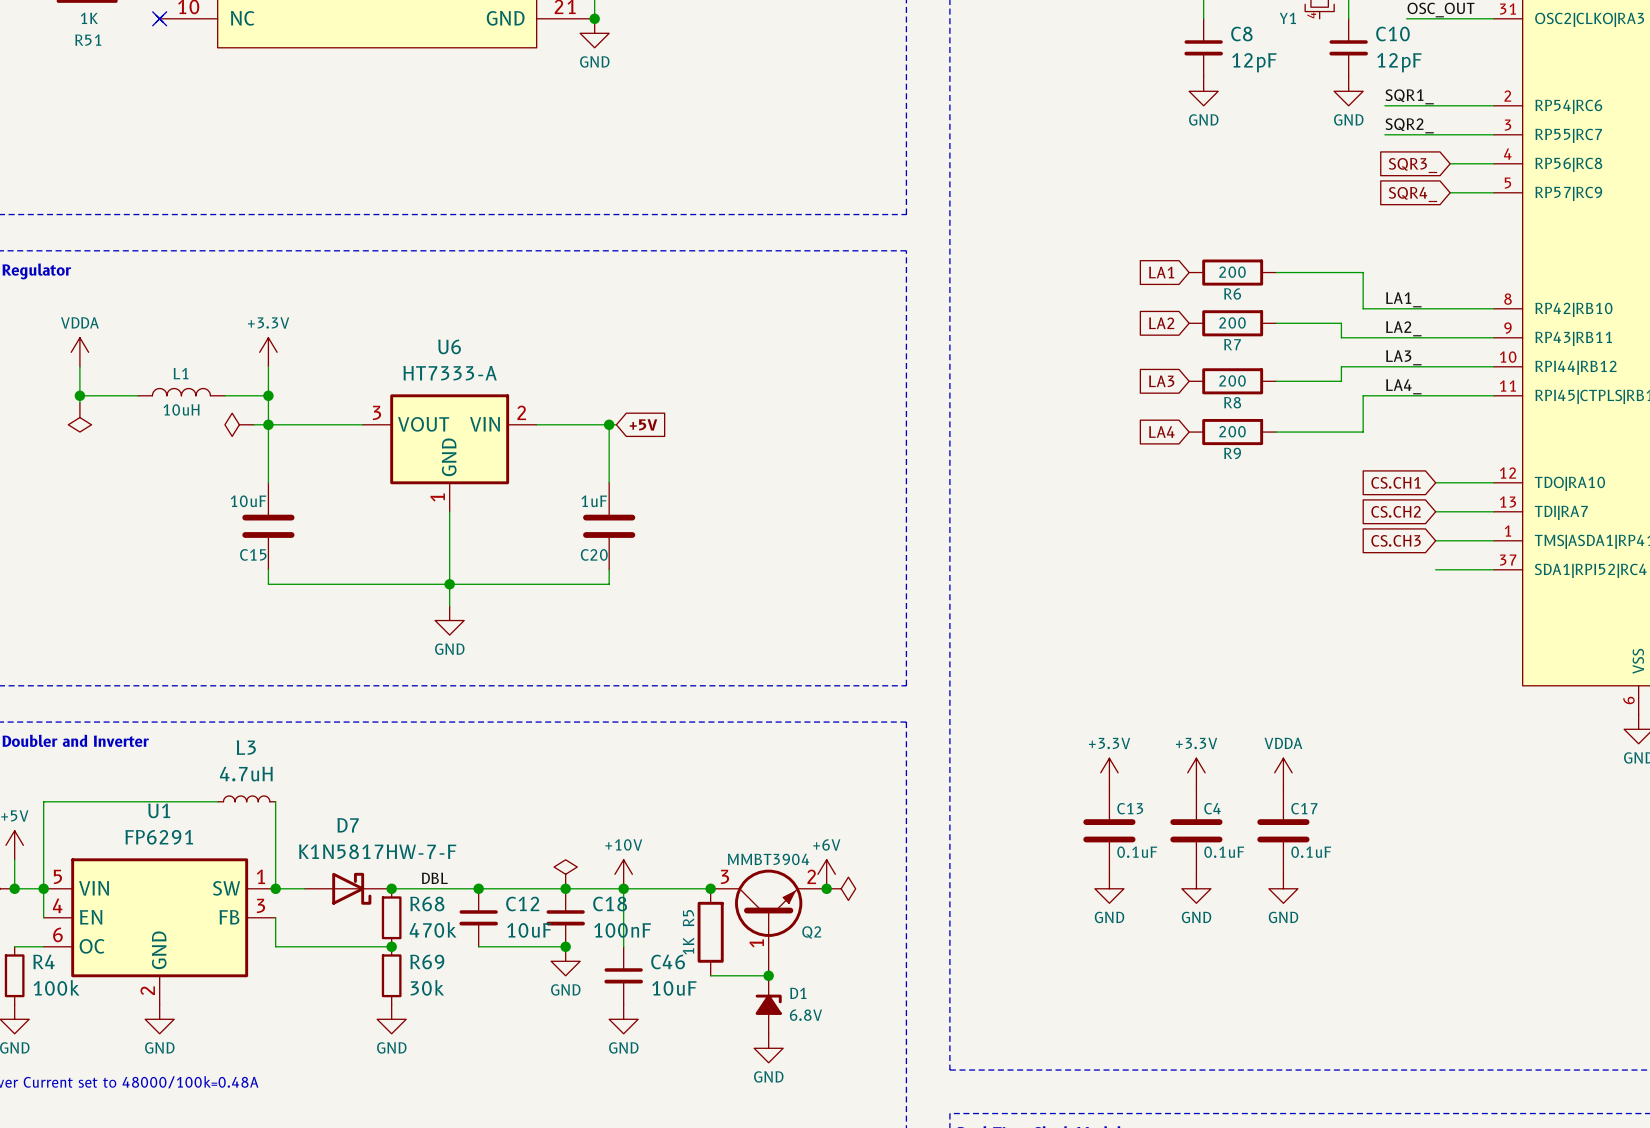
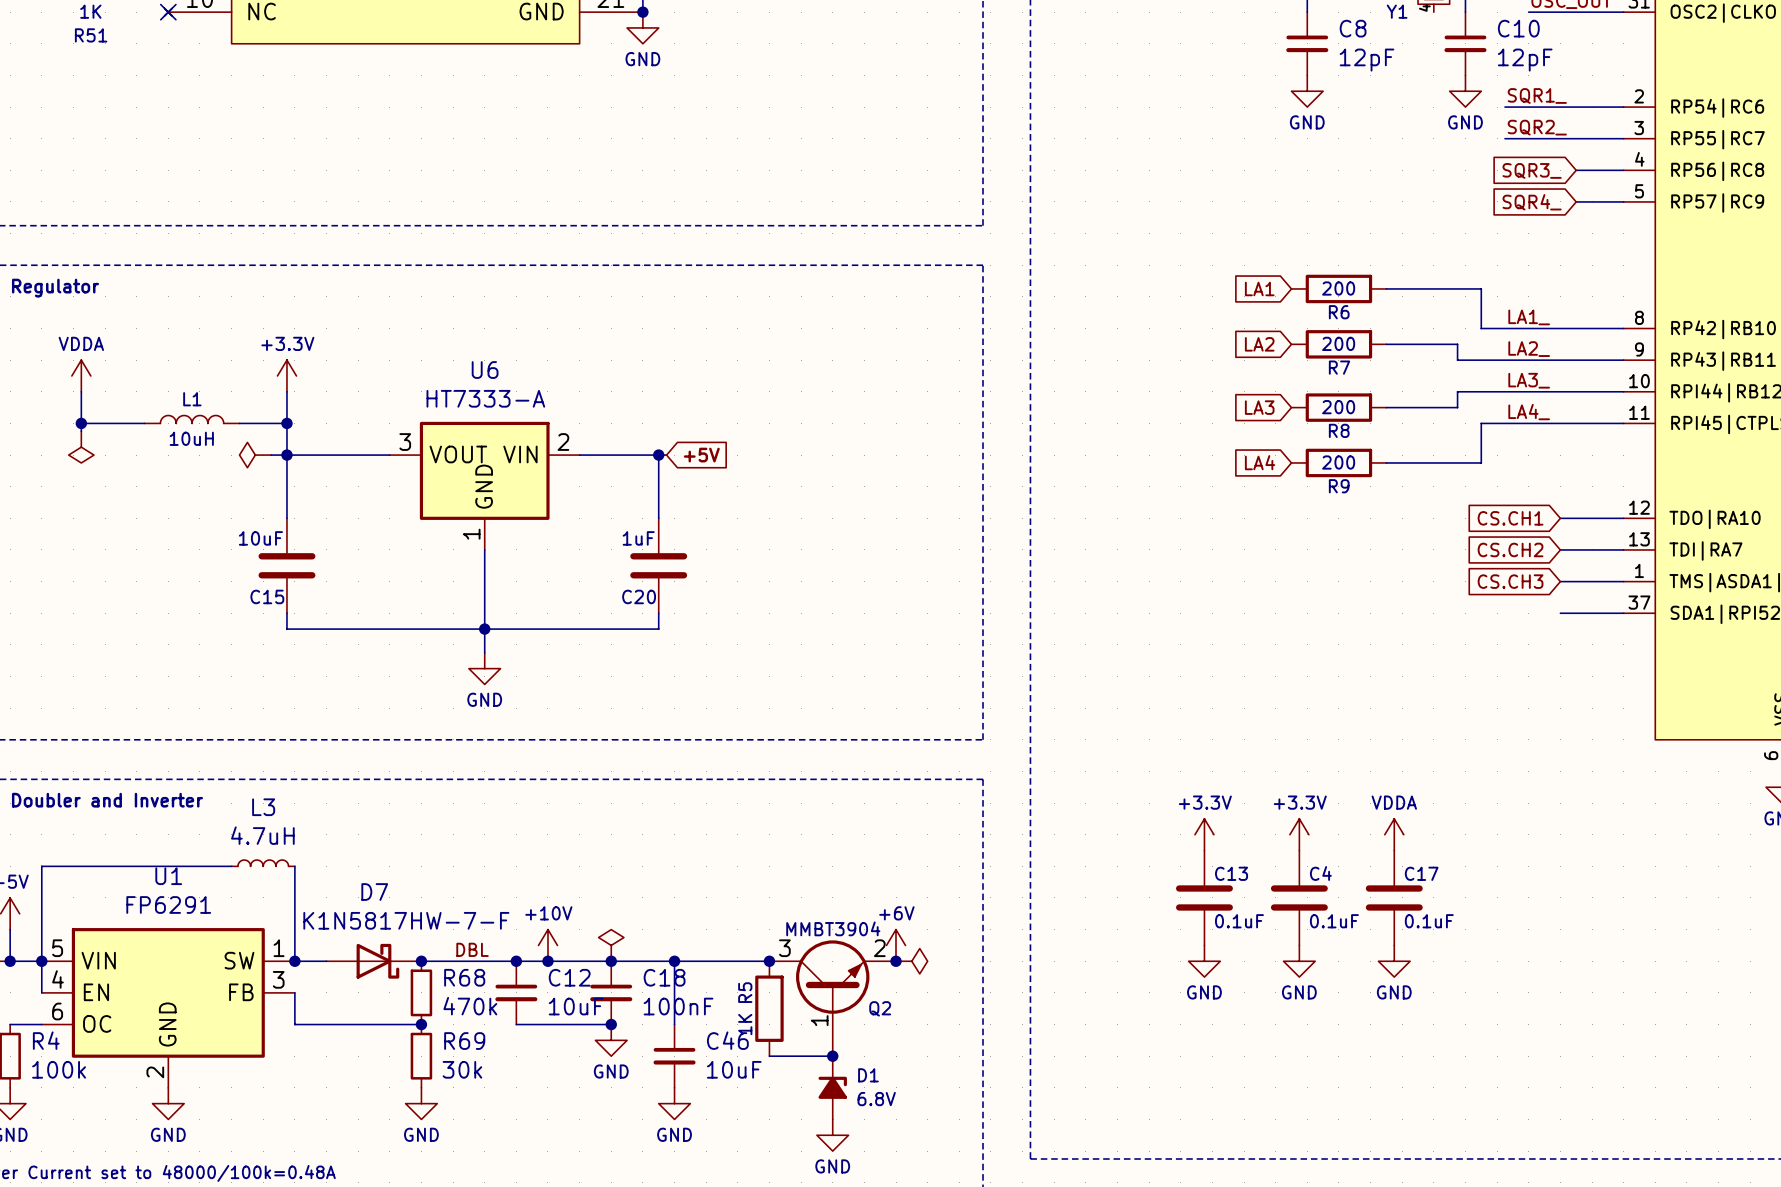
power symbol position: +10V (623, 874) -> +10V (547, 945)
junction: none -> (547, 961)

